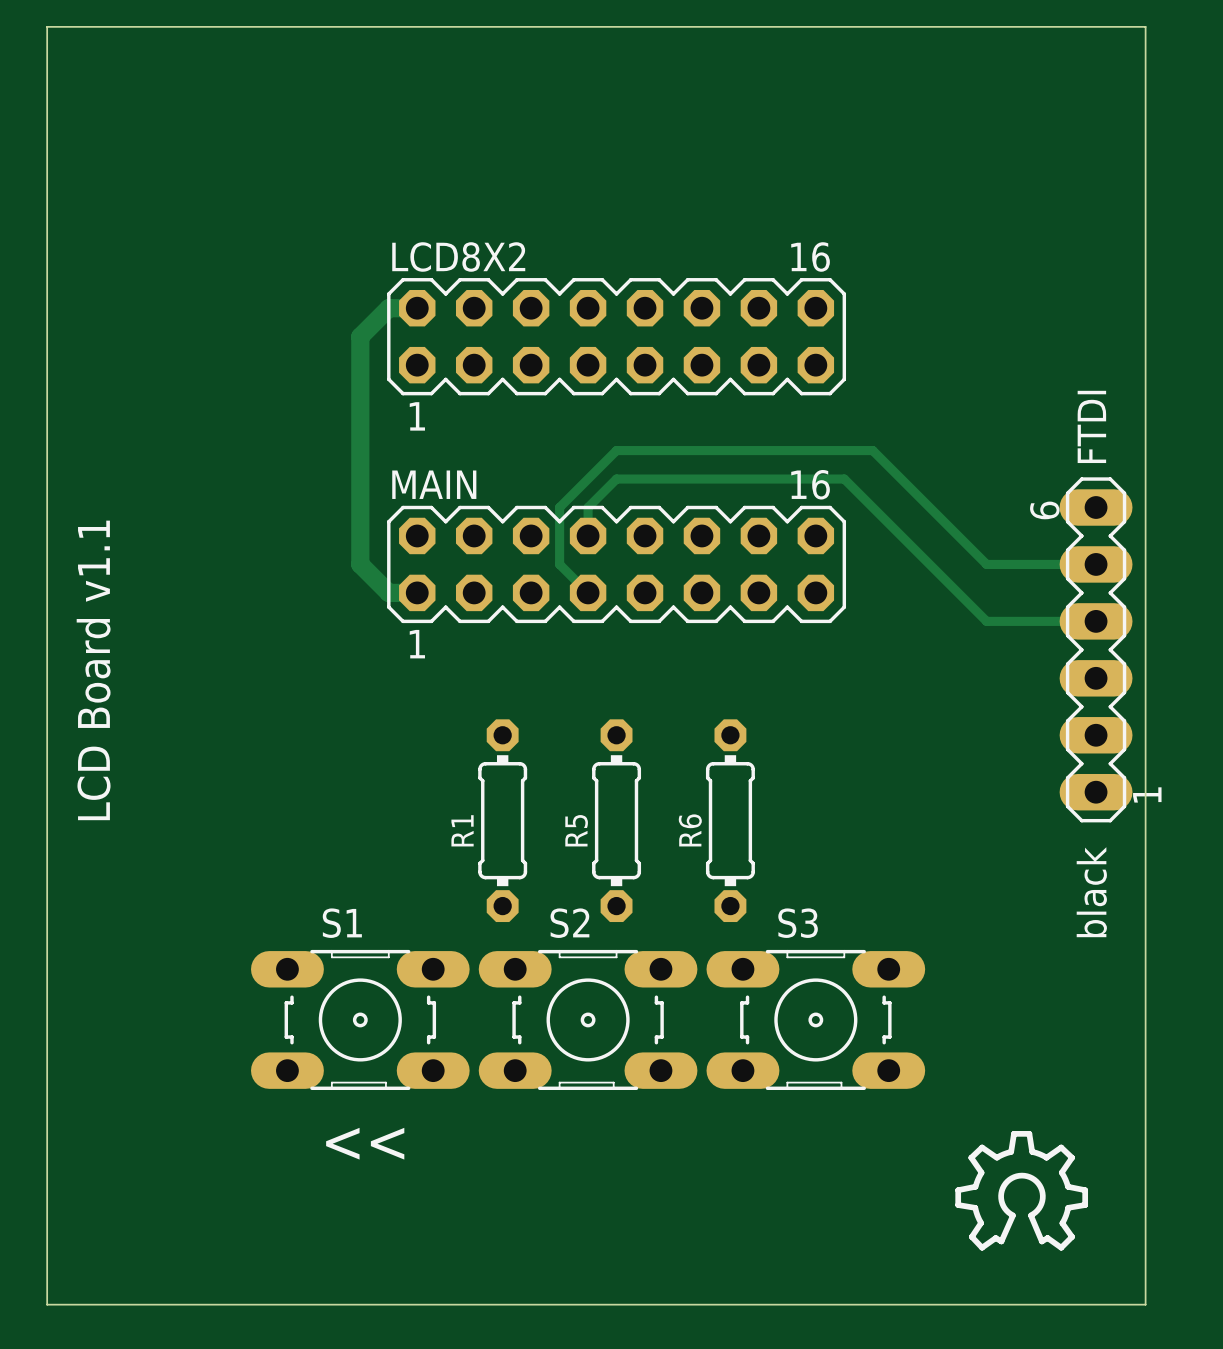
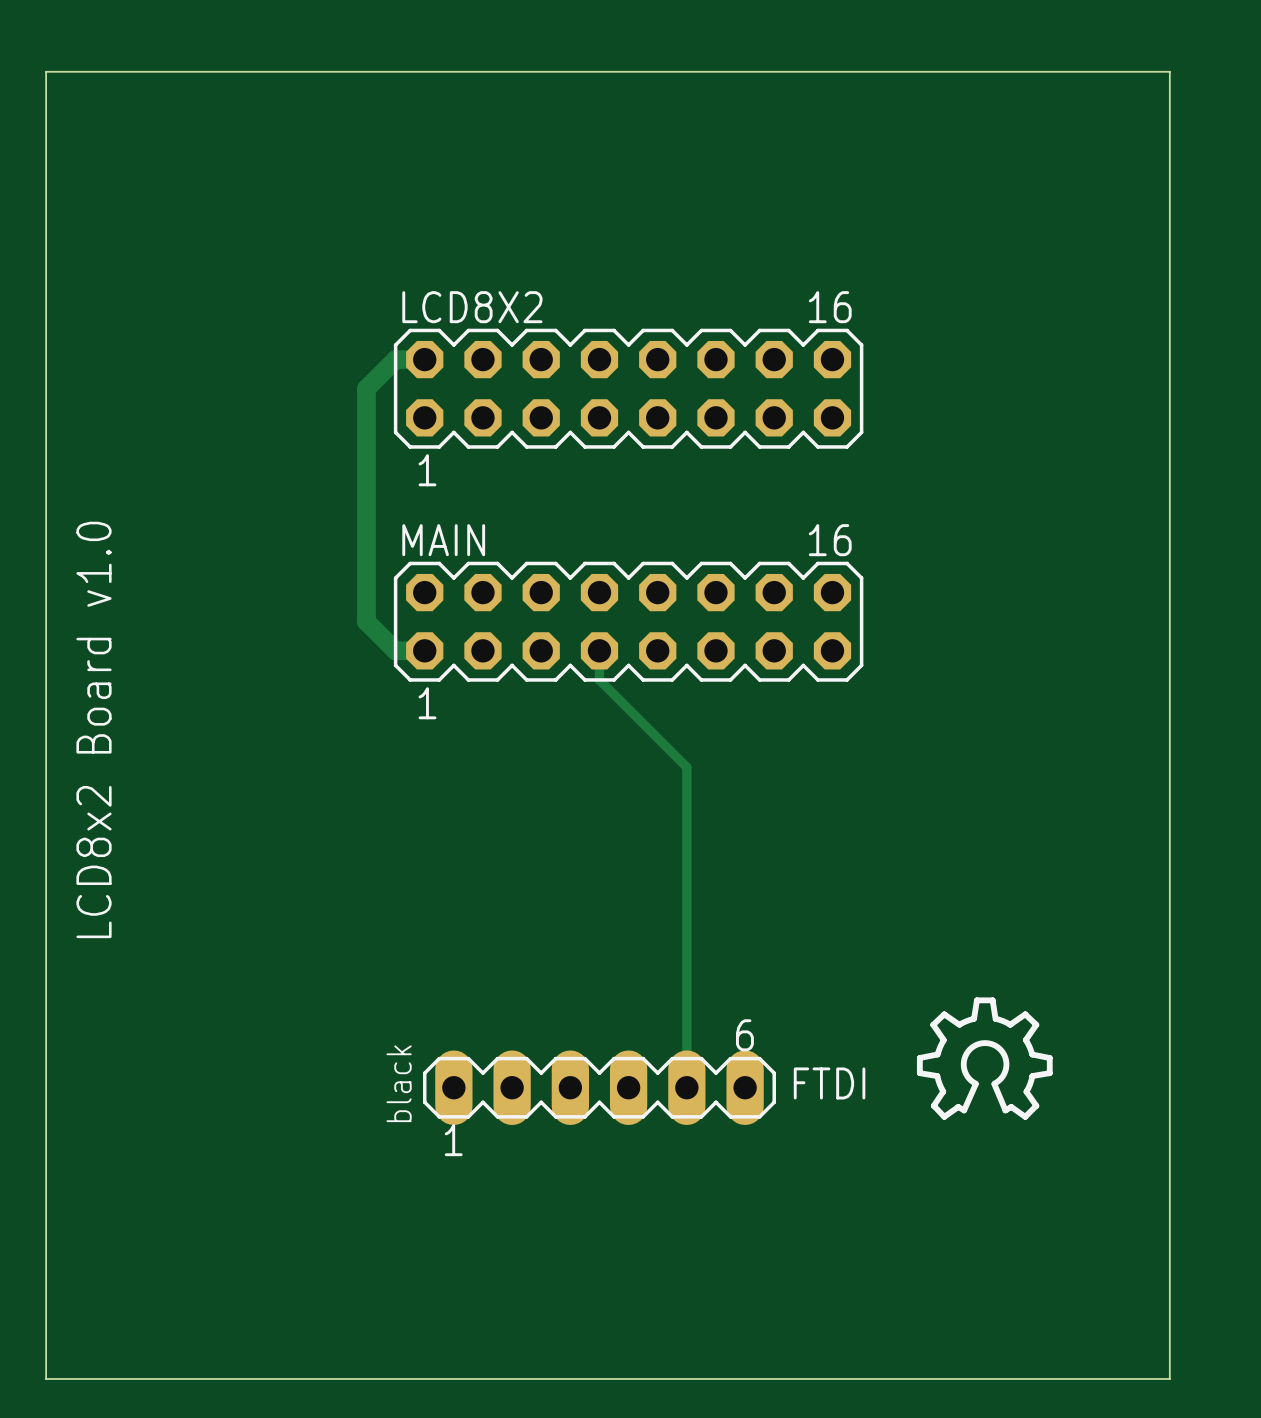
track: (588, 535) (588, 507) (616, 479) (844, 479) (986, 621) (1096, 621) -> none
track: (1096, 564) (986, 564) (872, 450) (616, 450) (559, 507) (559, 564) (588, 592) -> (686, 1087) (686, 767) (599, 679) (599, 650)
FTDI: (1096, 649) -> none
text: LCD Board v1.1 (93, 670) -> LCD8x2 Board v1.0 (94, 729)
R1: (502, 820) -> none
R5: (616, 820) -> none
R6: (730, 820) -> none
text: black (1091, 892) -> none
S1: << (360, 1019) -> none
S2: (588, 1019) -> none
FTDI: none -> (599, 1087)
S3: (815, 1019) -> none
text: none -> black (399, 1083)
drawing position: (1021, 1190) -> (984, 1058)

